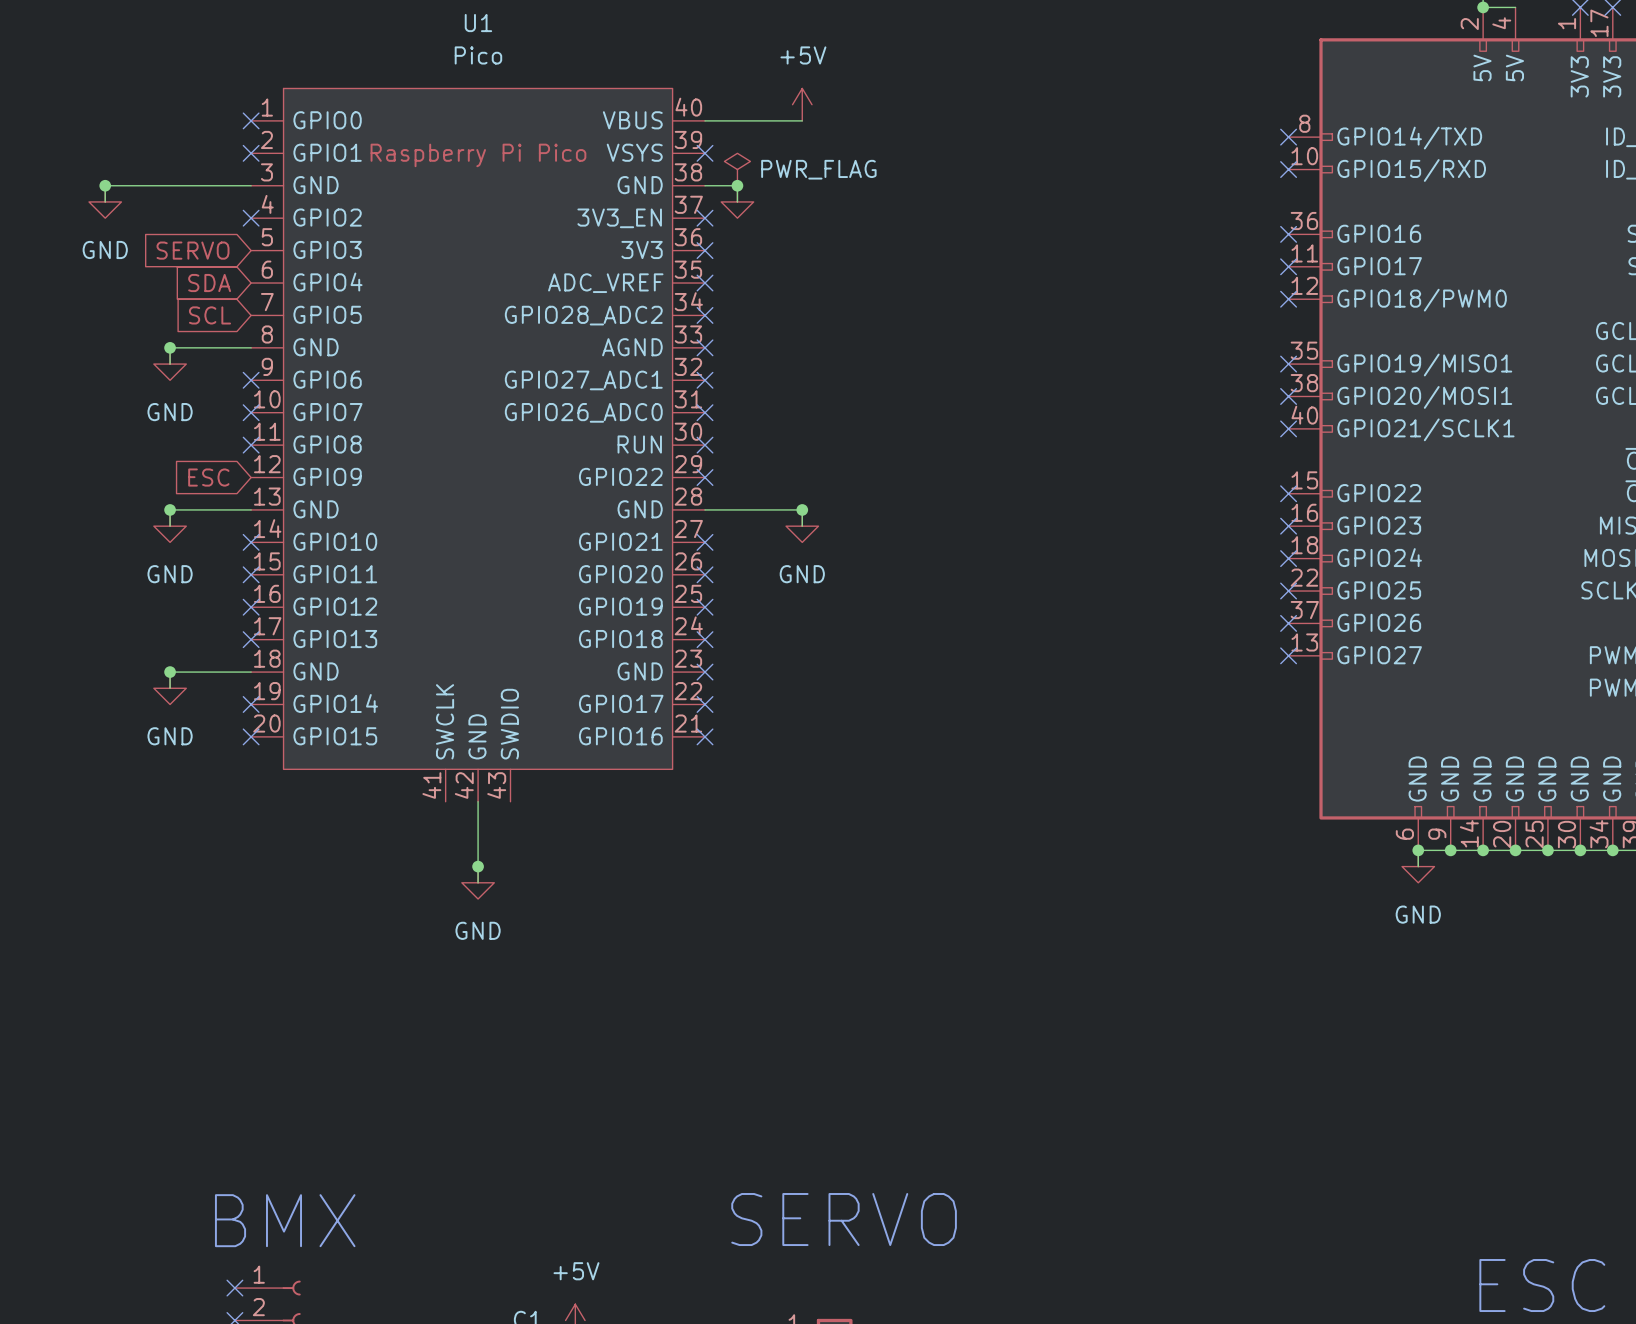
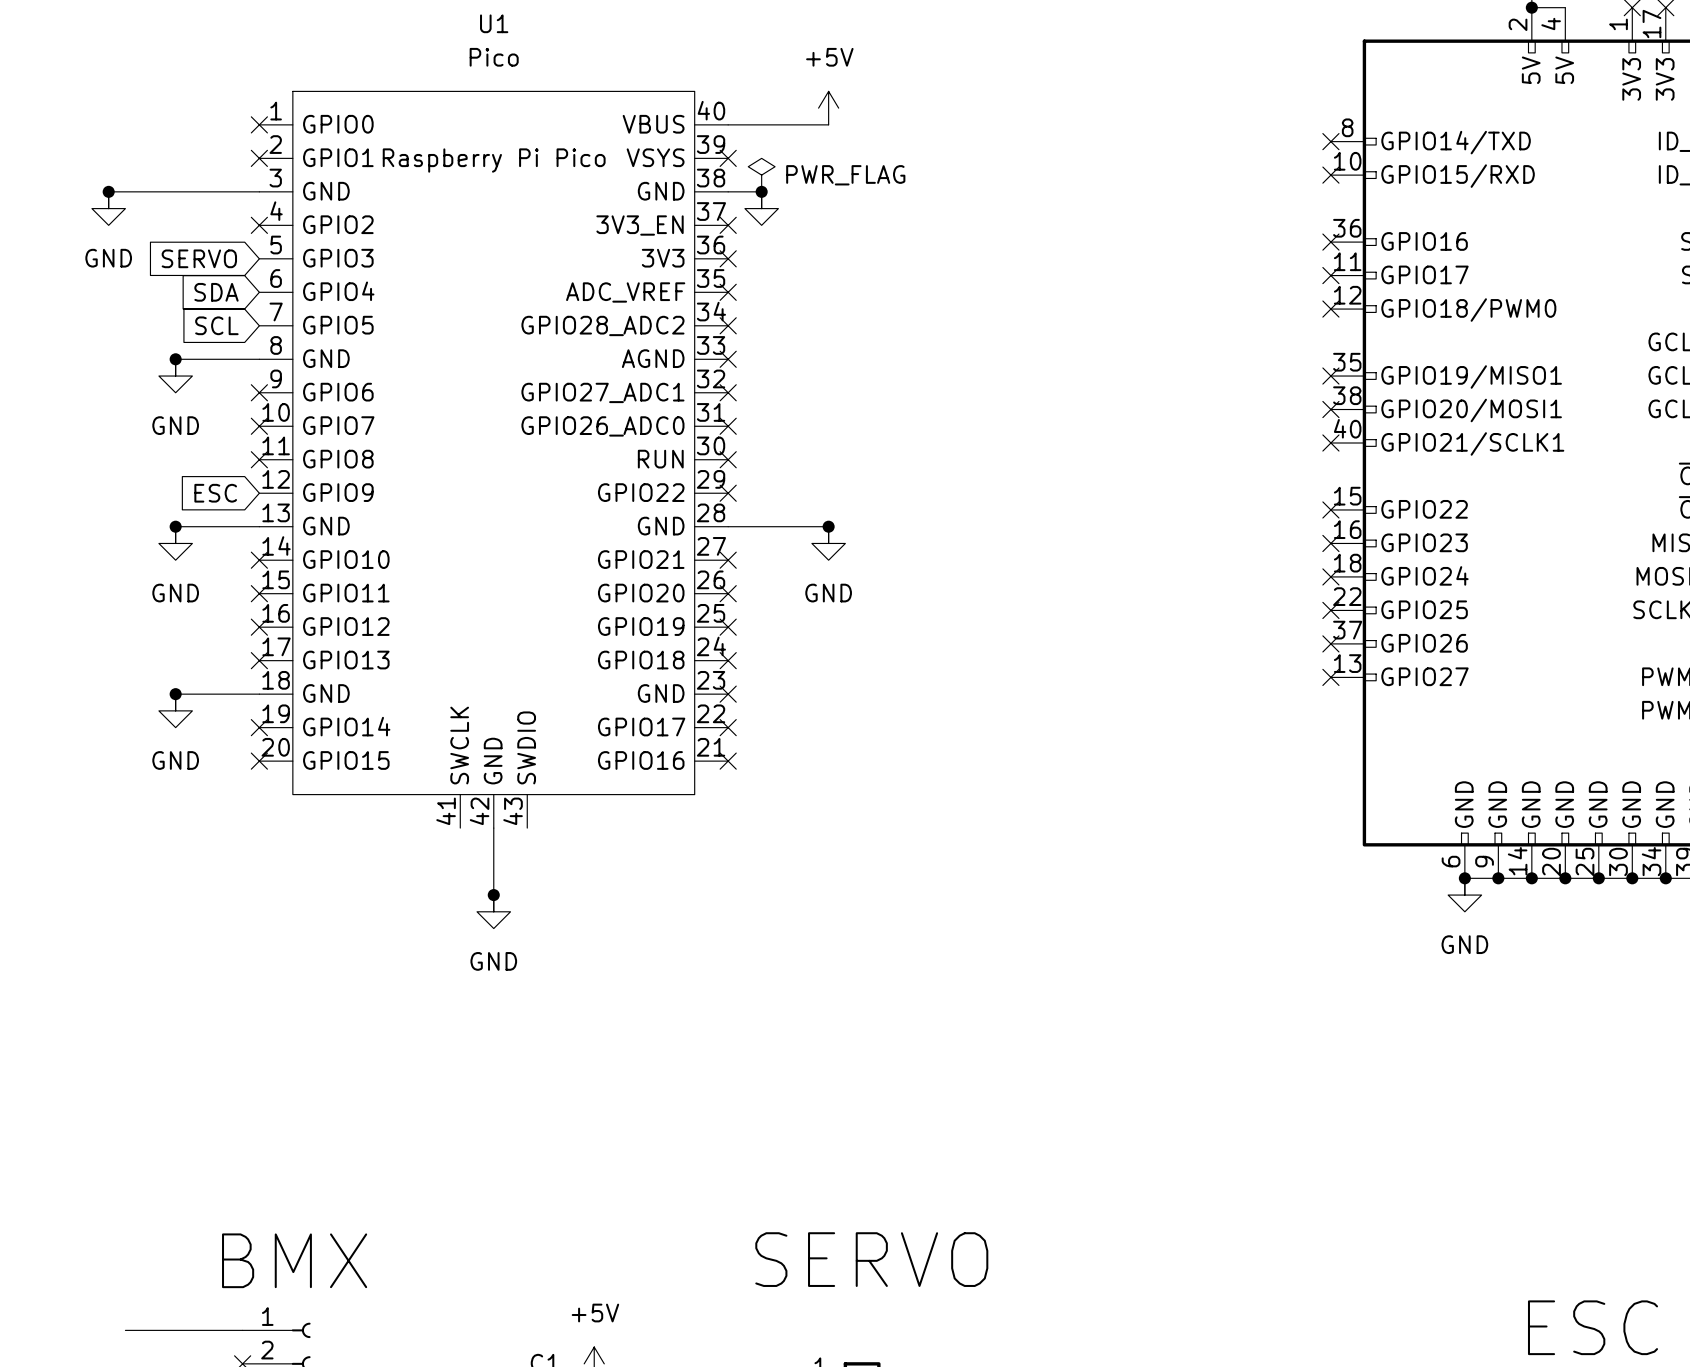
wire: none -> (125, 1330) (242, 1330)
no-connect mark: (234, 1288) -> none

